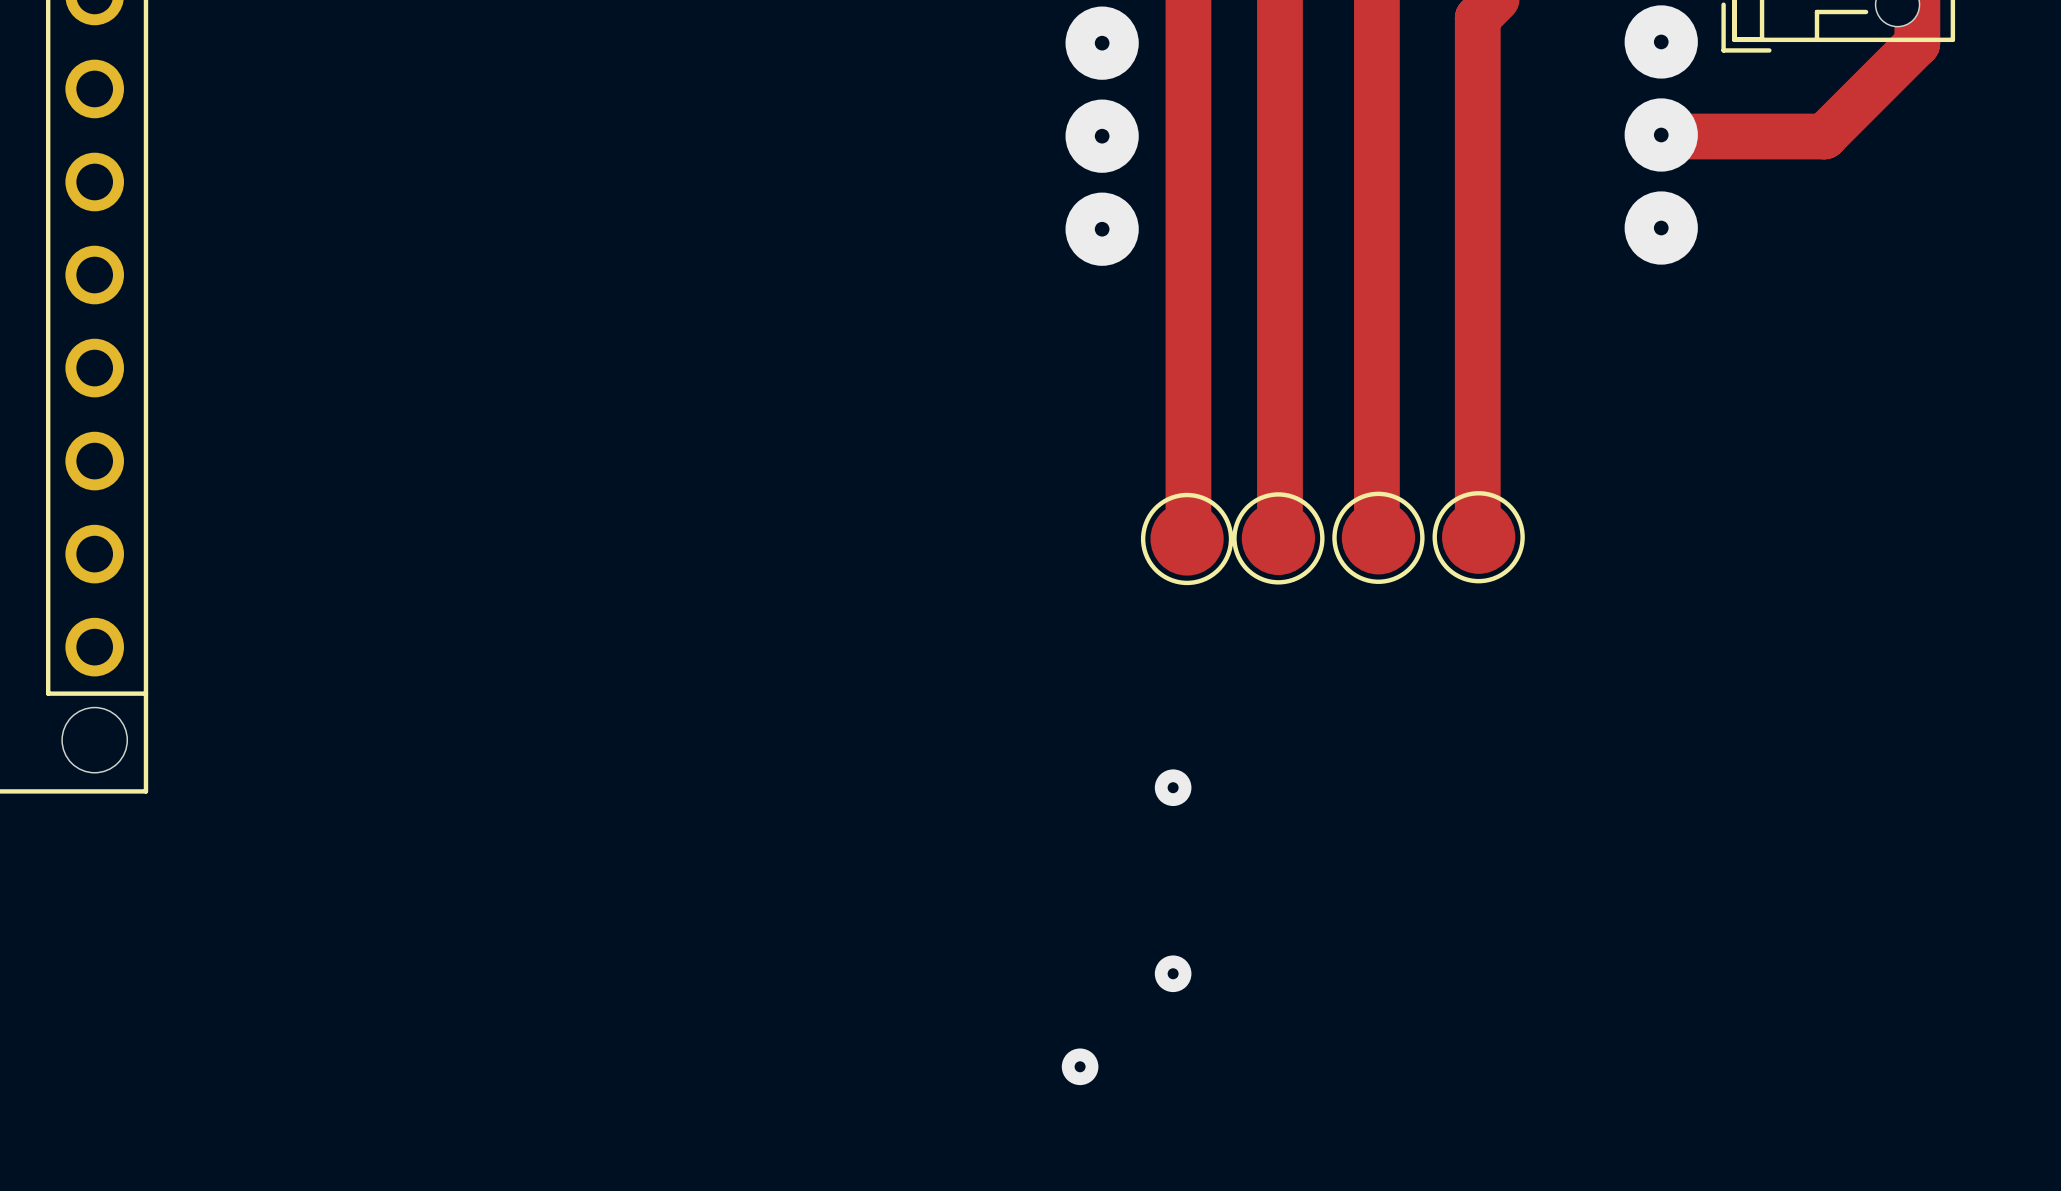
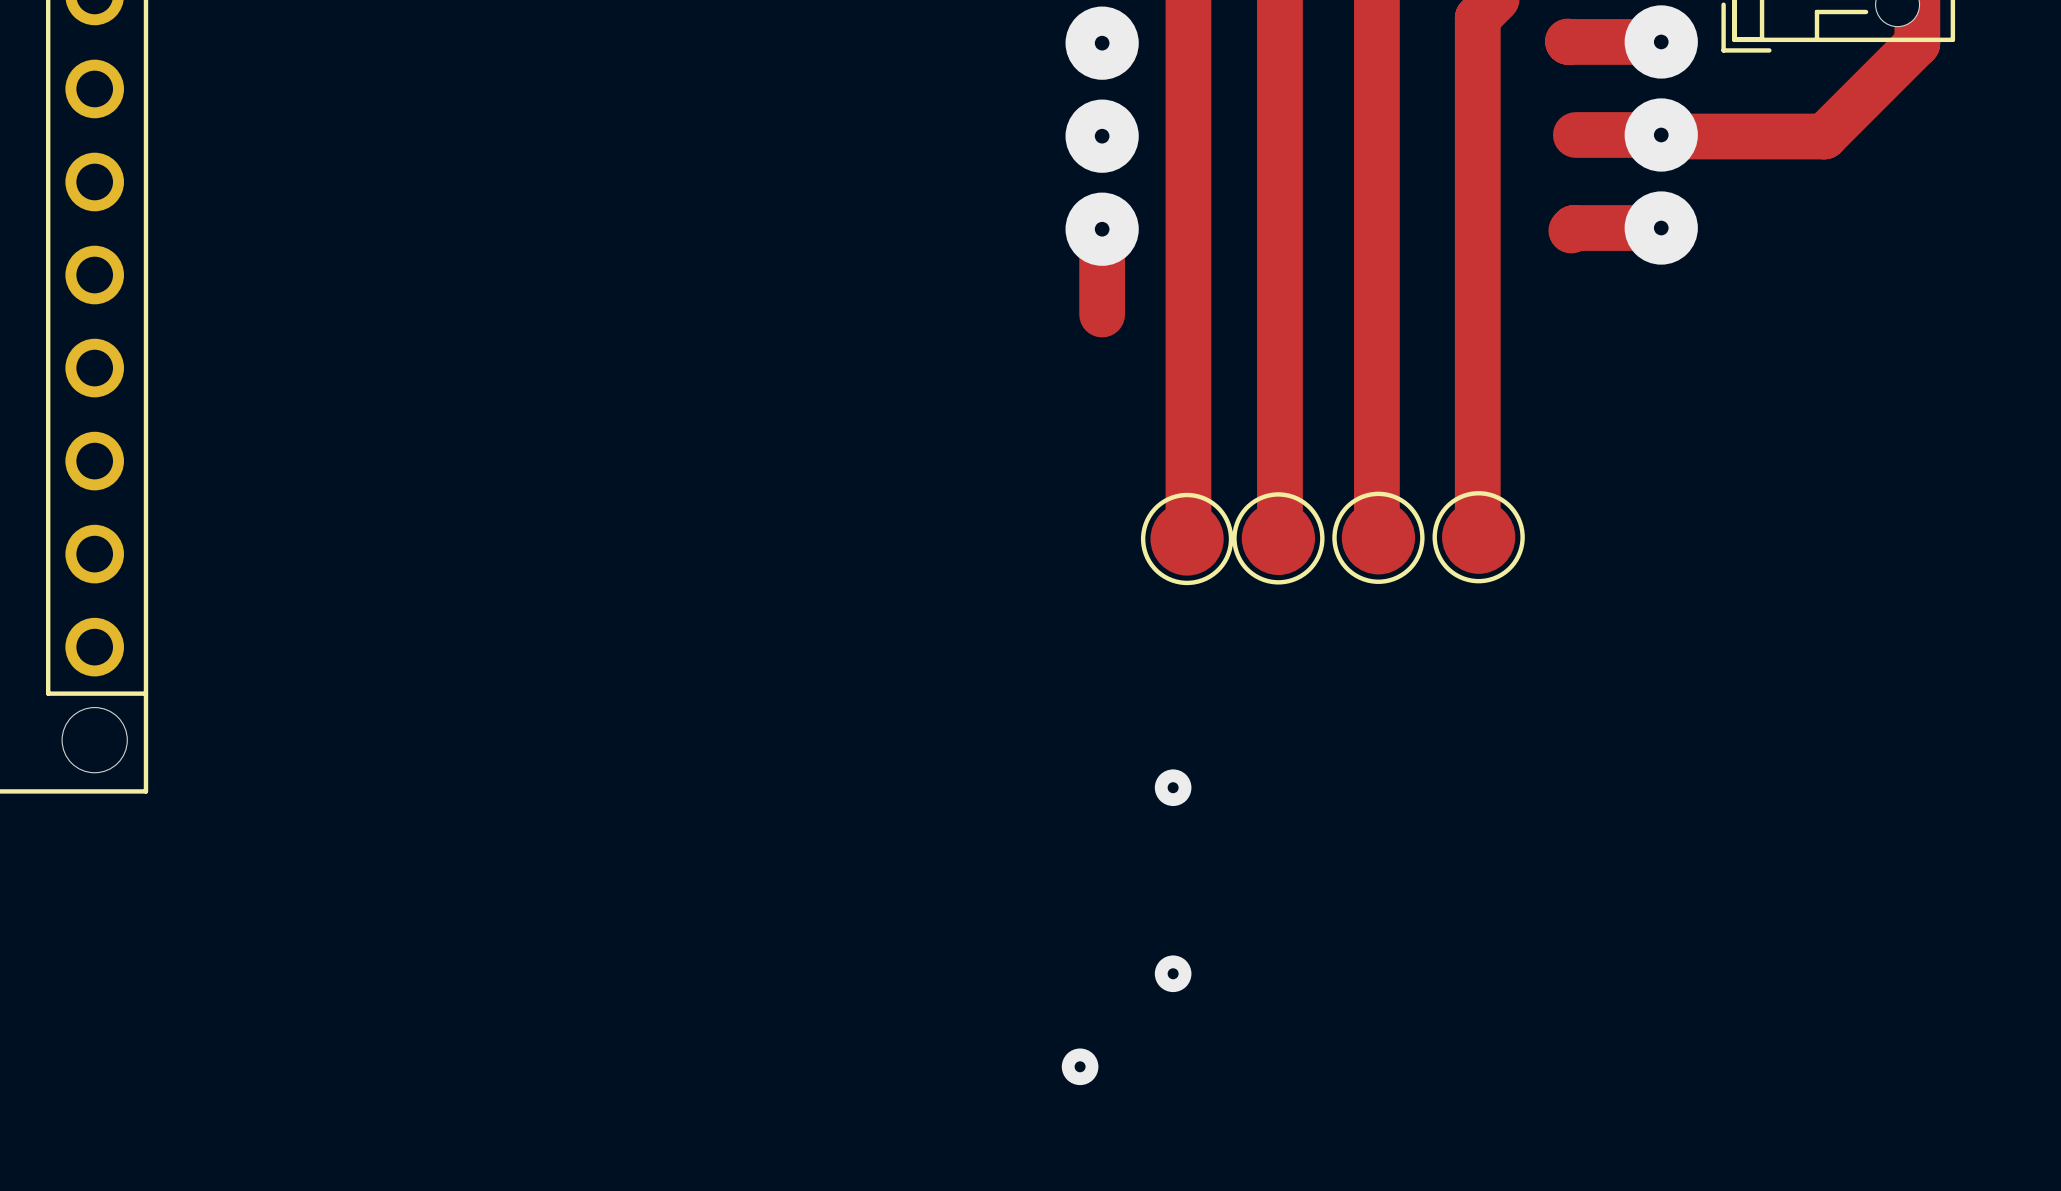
track: none -> (1568, 41) (1661, 41)
track: none -> (1575, 134) (1661, 134)
track: none -> (1661, 228) (1573, 228) (1571, 230)
track: none -> (1102, 229) (1102, 314)

